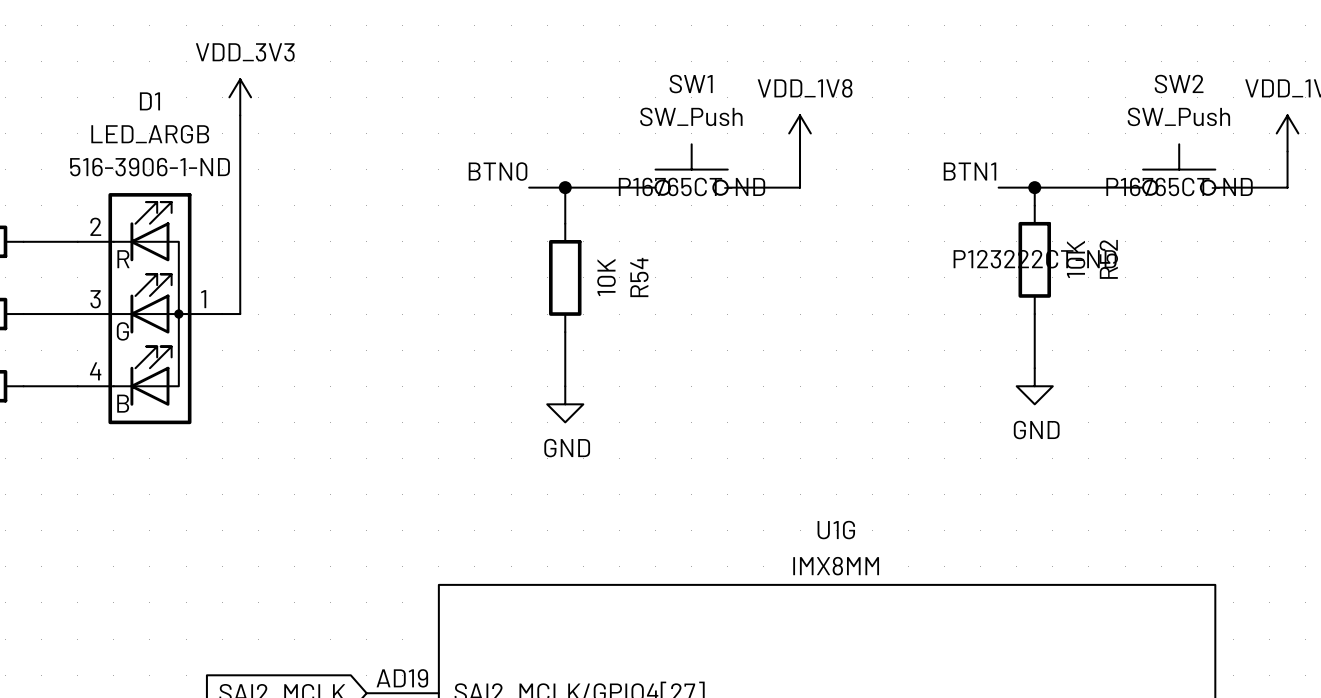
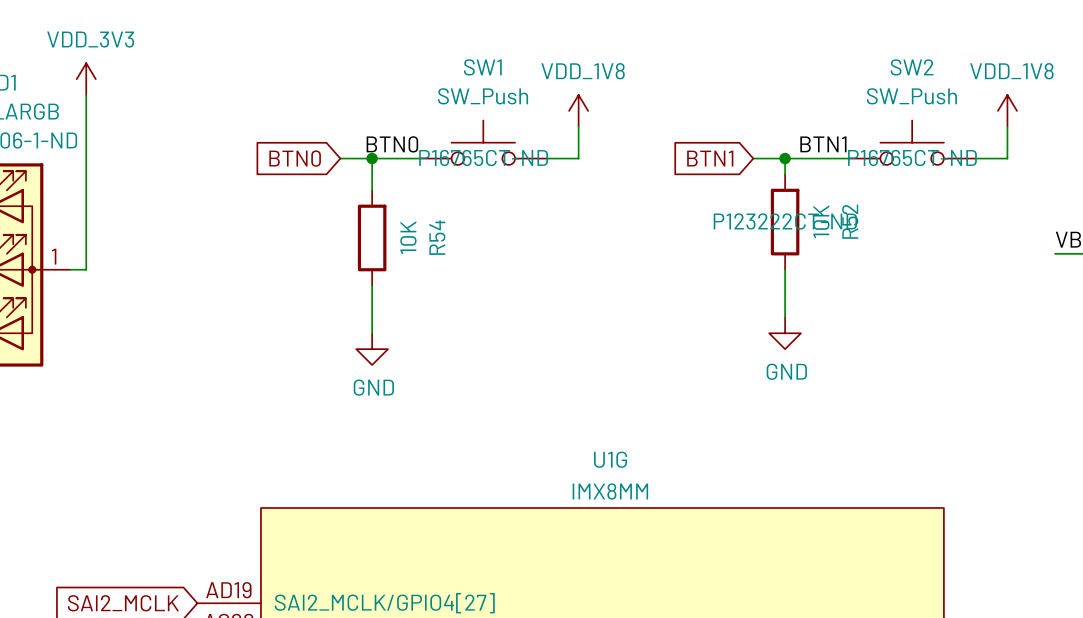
label position: BTN0 (498, 171) -> BTN0 (392, 144)
label position: BTN1 (969, 171) -> BTN1 (823, 144)
global label: none -> BTN0 (295, 158)
global label: none -> BTN1 (710, 158)

